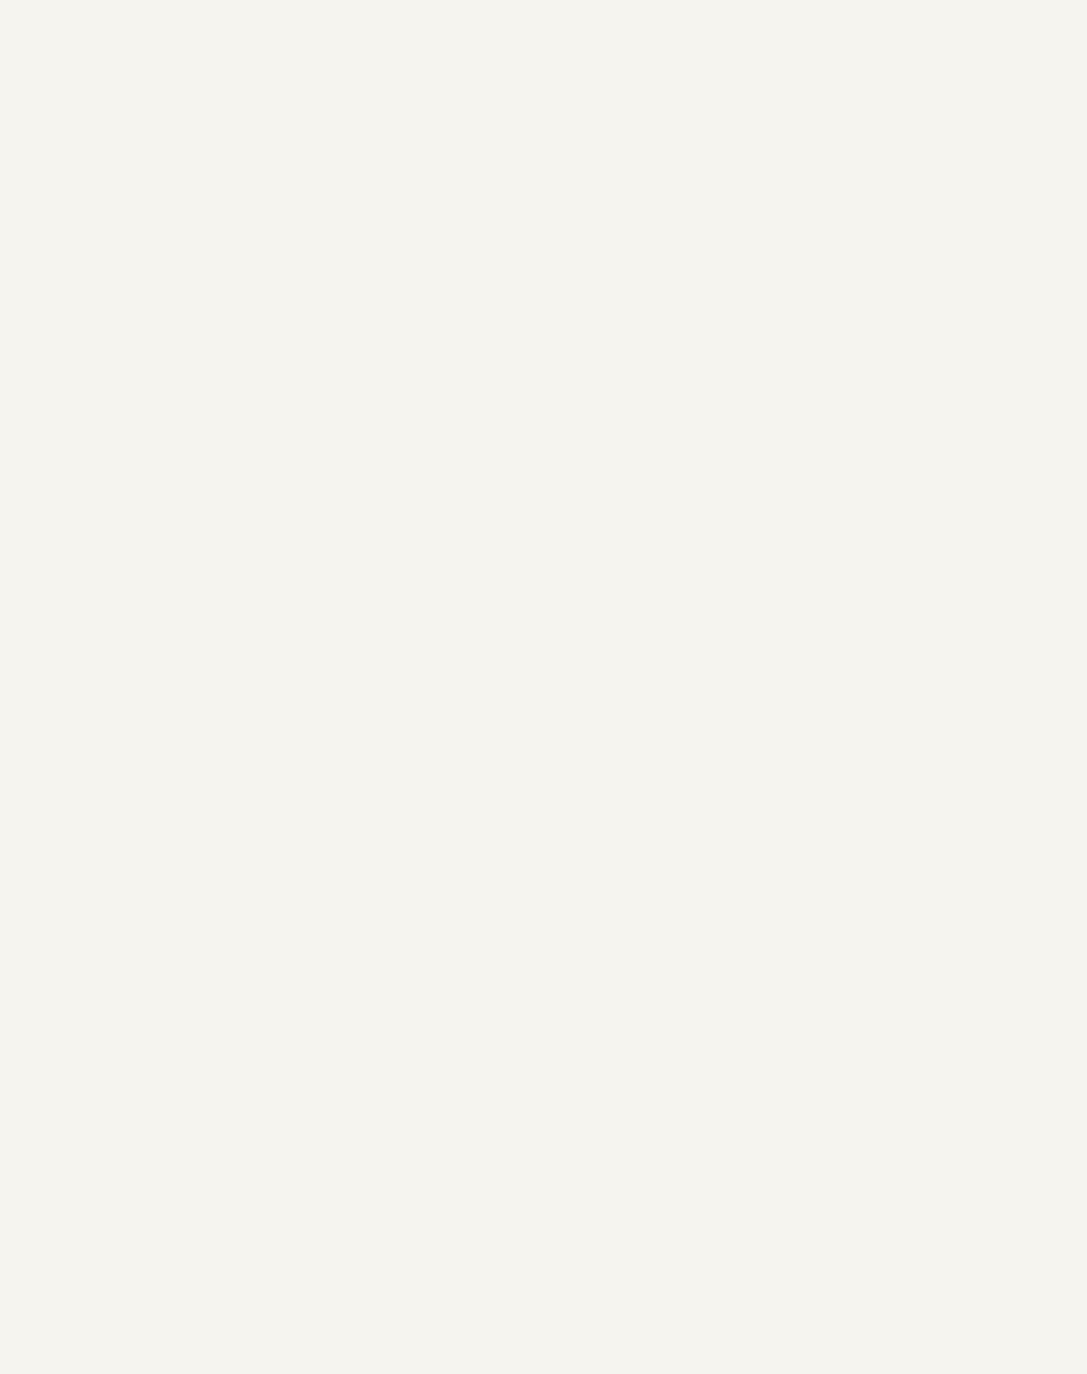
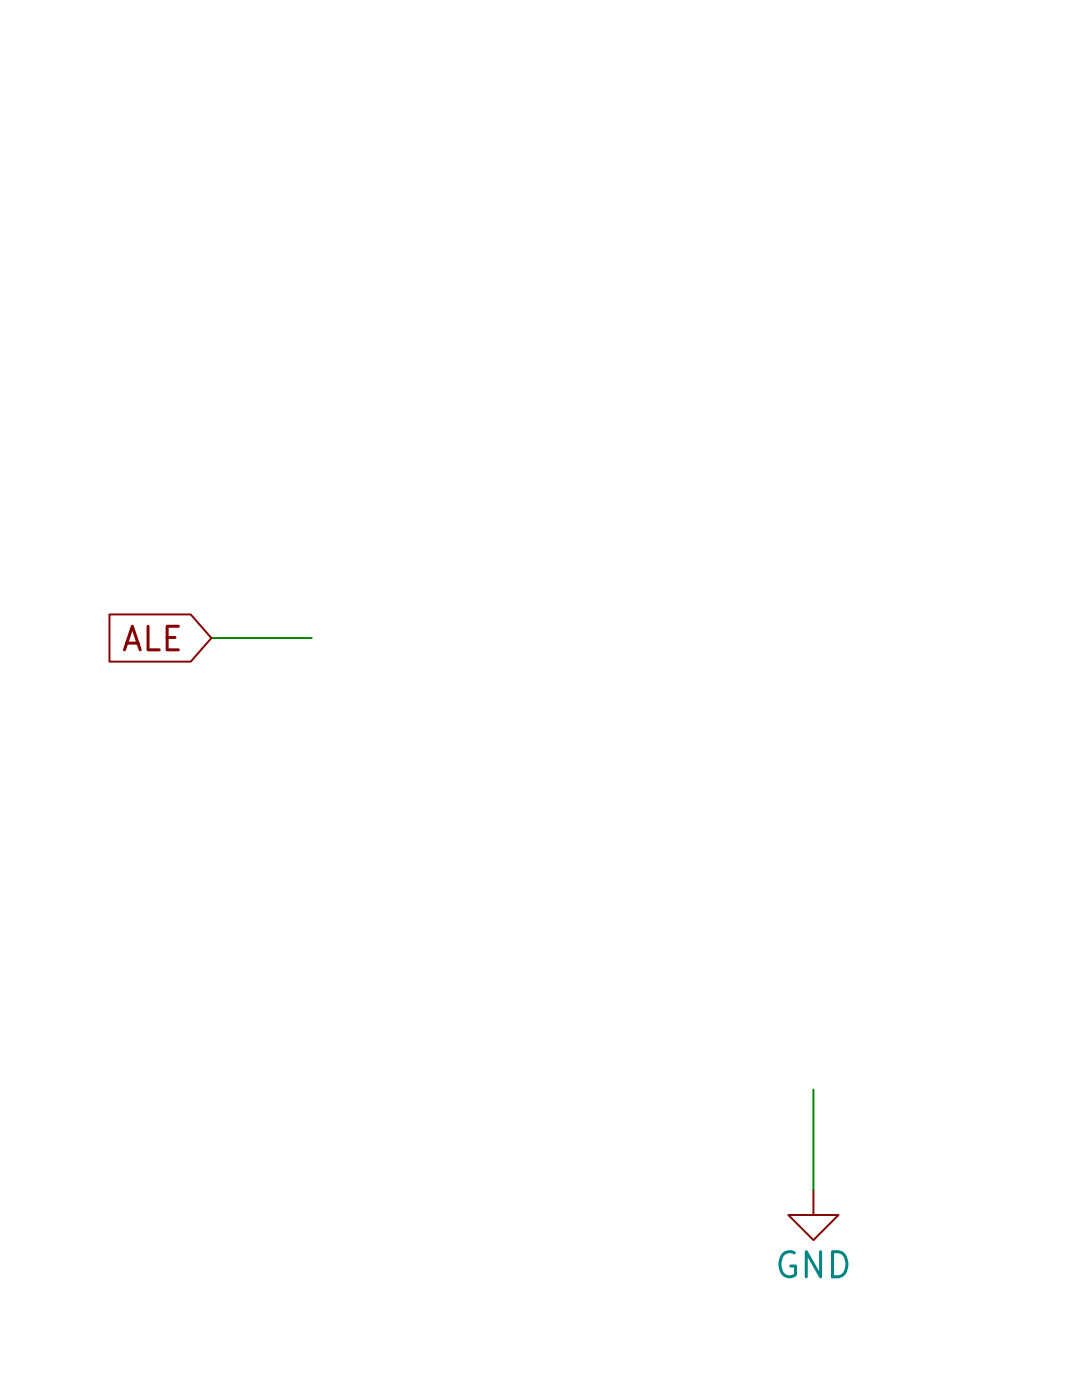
global label: none -> ALE (151, 638)
wire: none -> (211, 638) (311, 638)
wire: none -> (813, 1089) (813, 1189)
power symbol: none -> GND (813, 1215)

